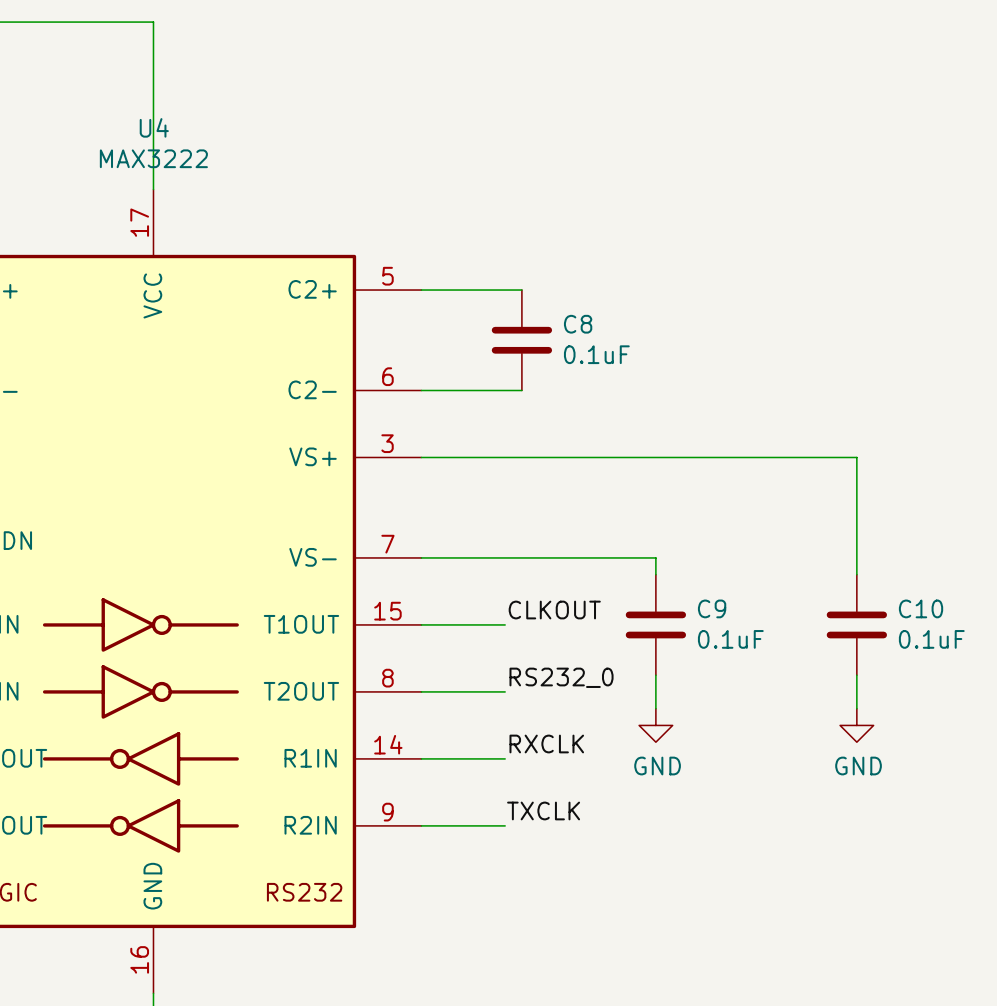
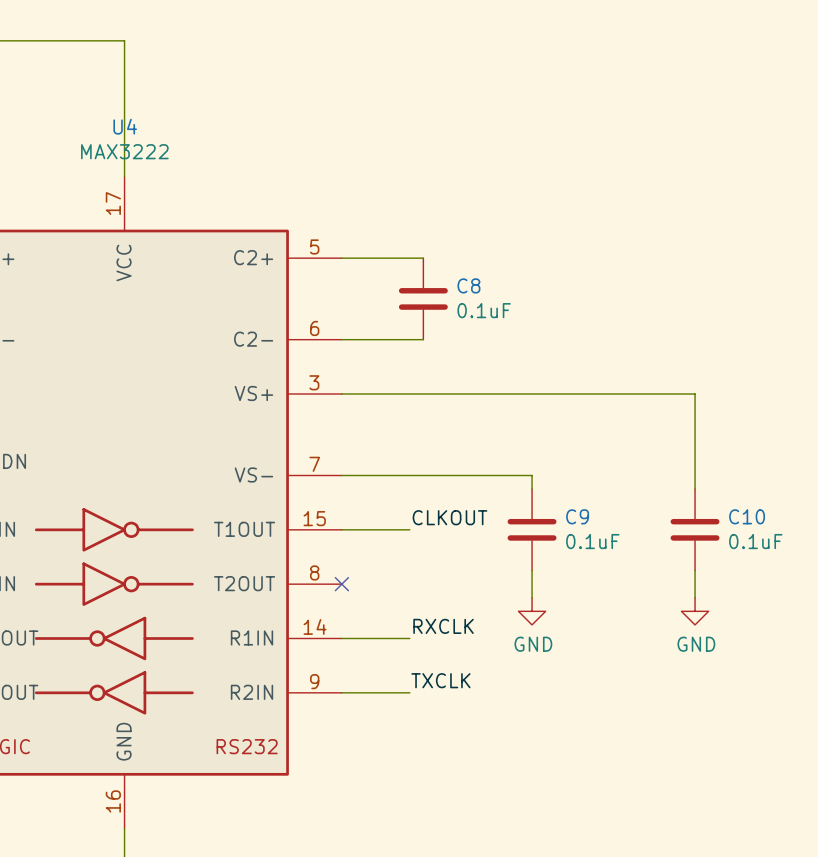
label: RS232_0 (561, 677) -> none
wire: (421, 691) (505, 691) -> none
no-connect mark: none -> (341, 584)

